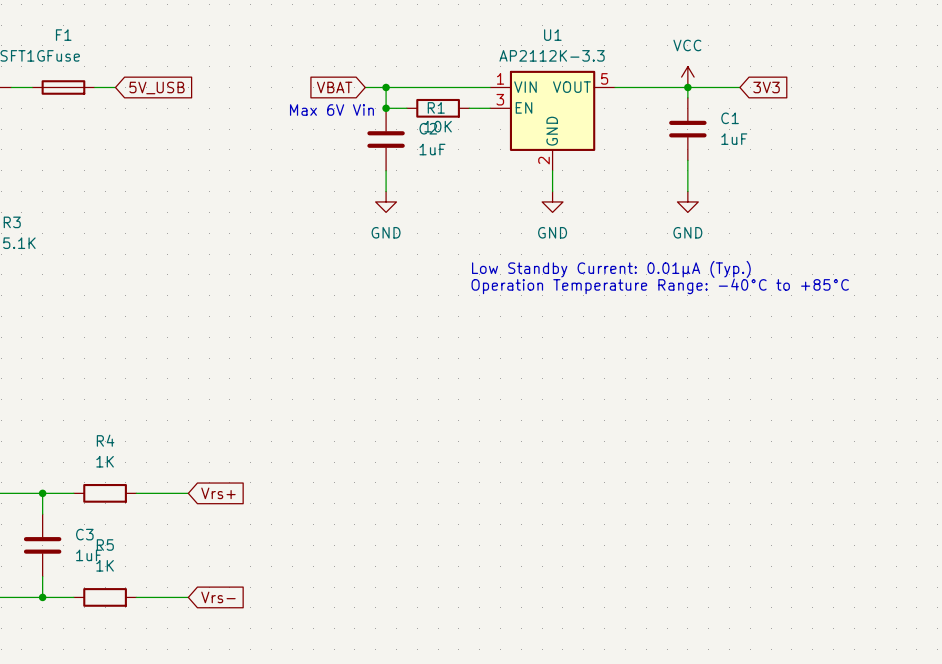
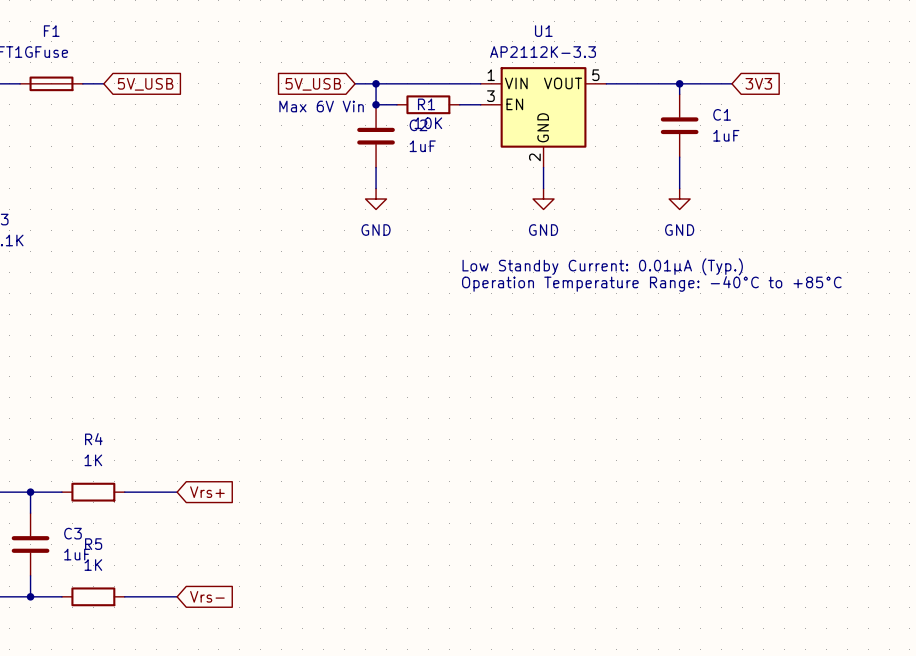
power symbol: VCC (687, 77) -> none
global label: VBAT (334, 87) -> 5V_USB (313, 84)

